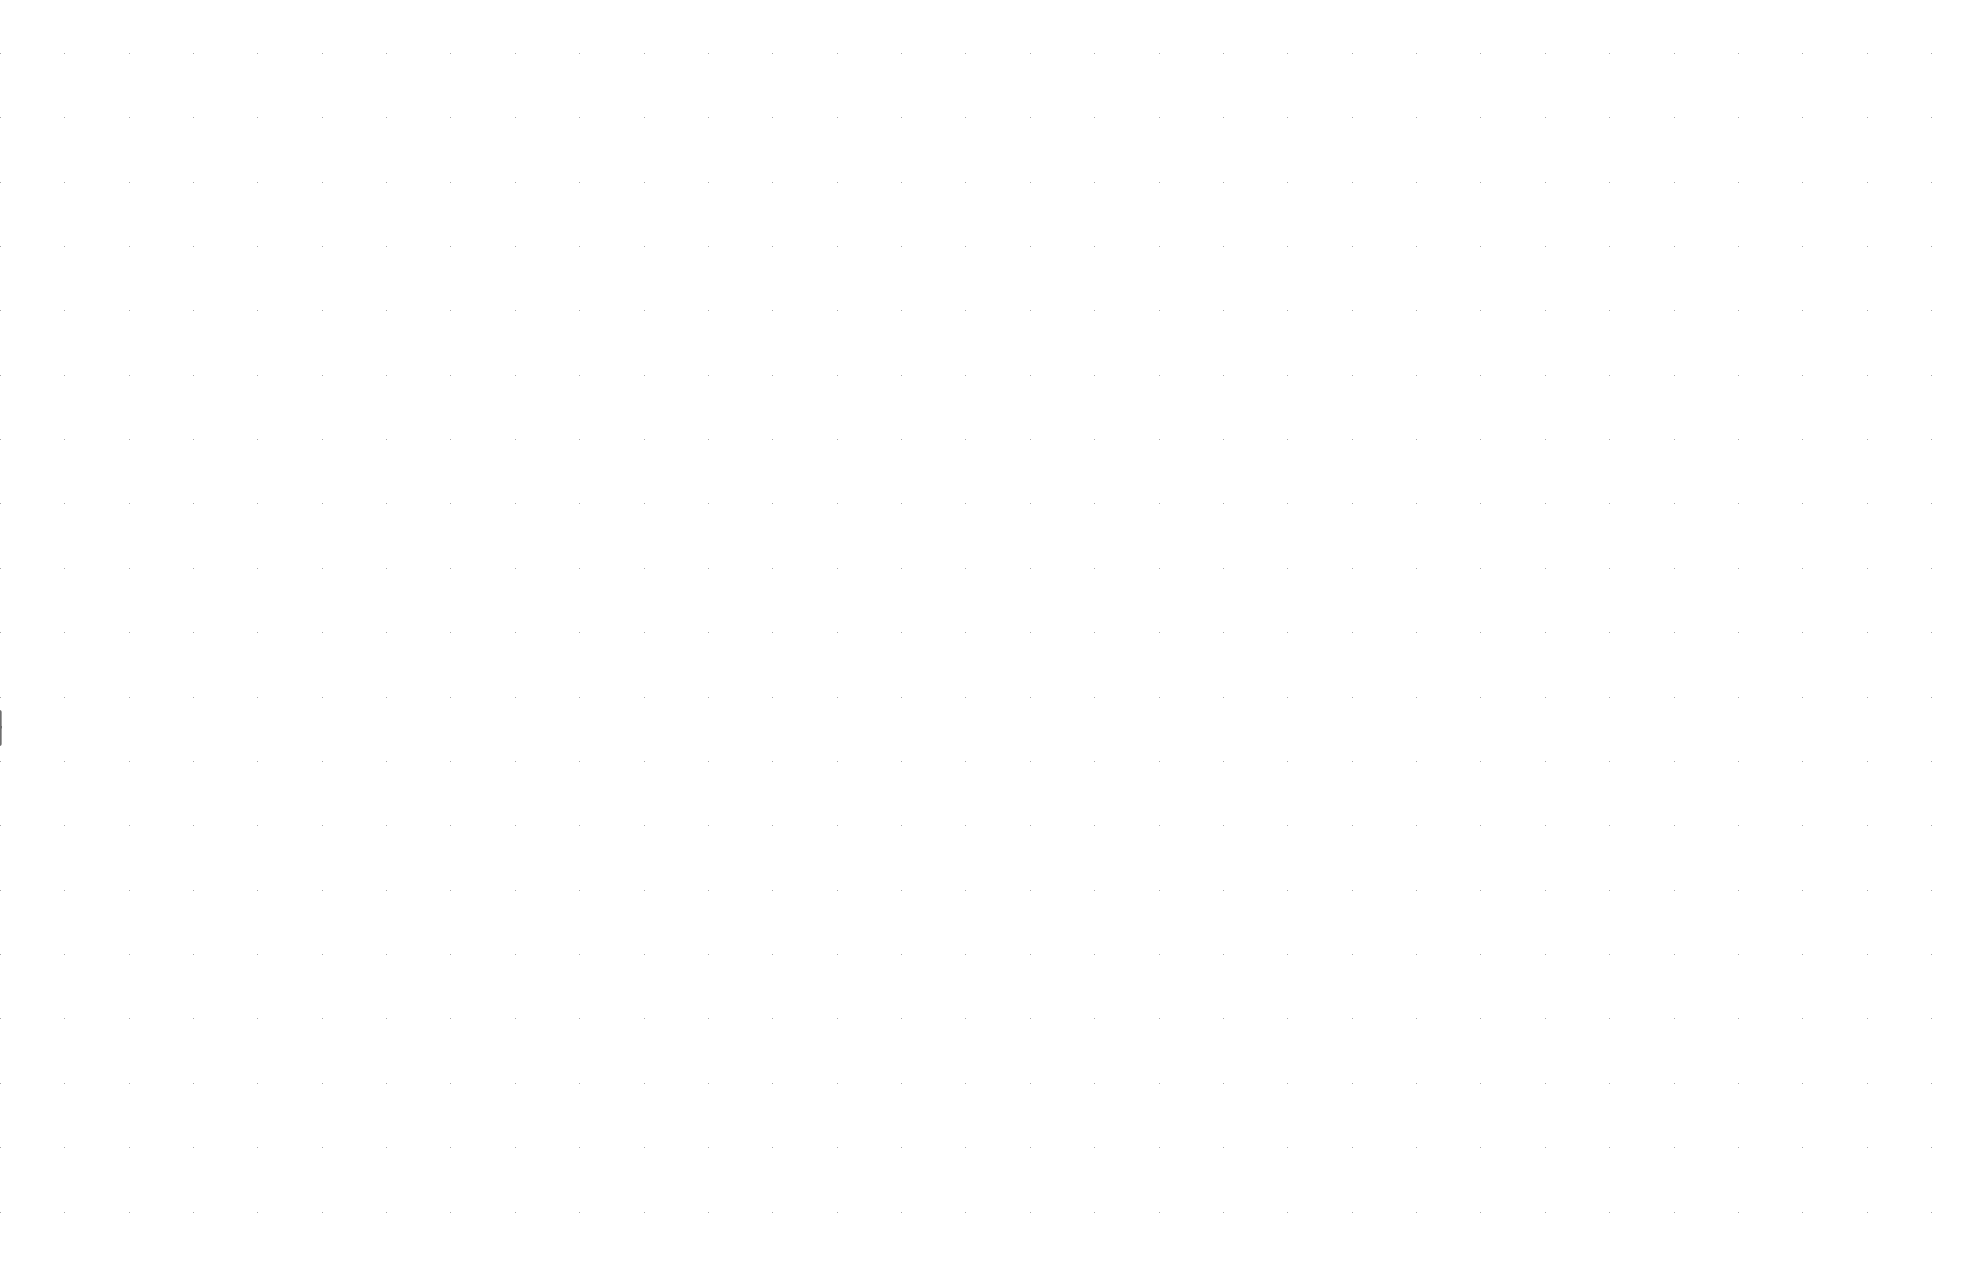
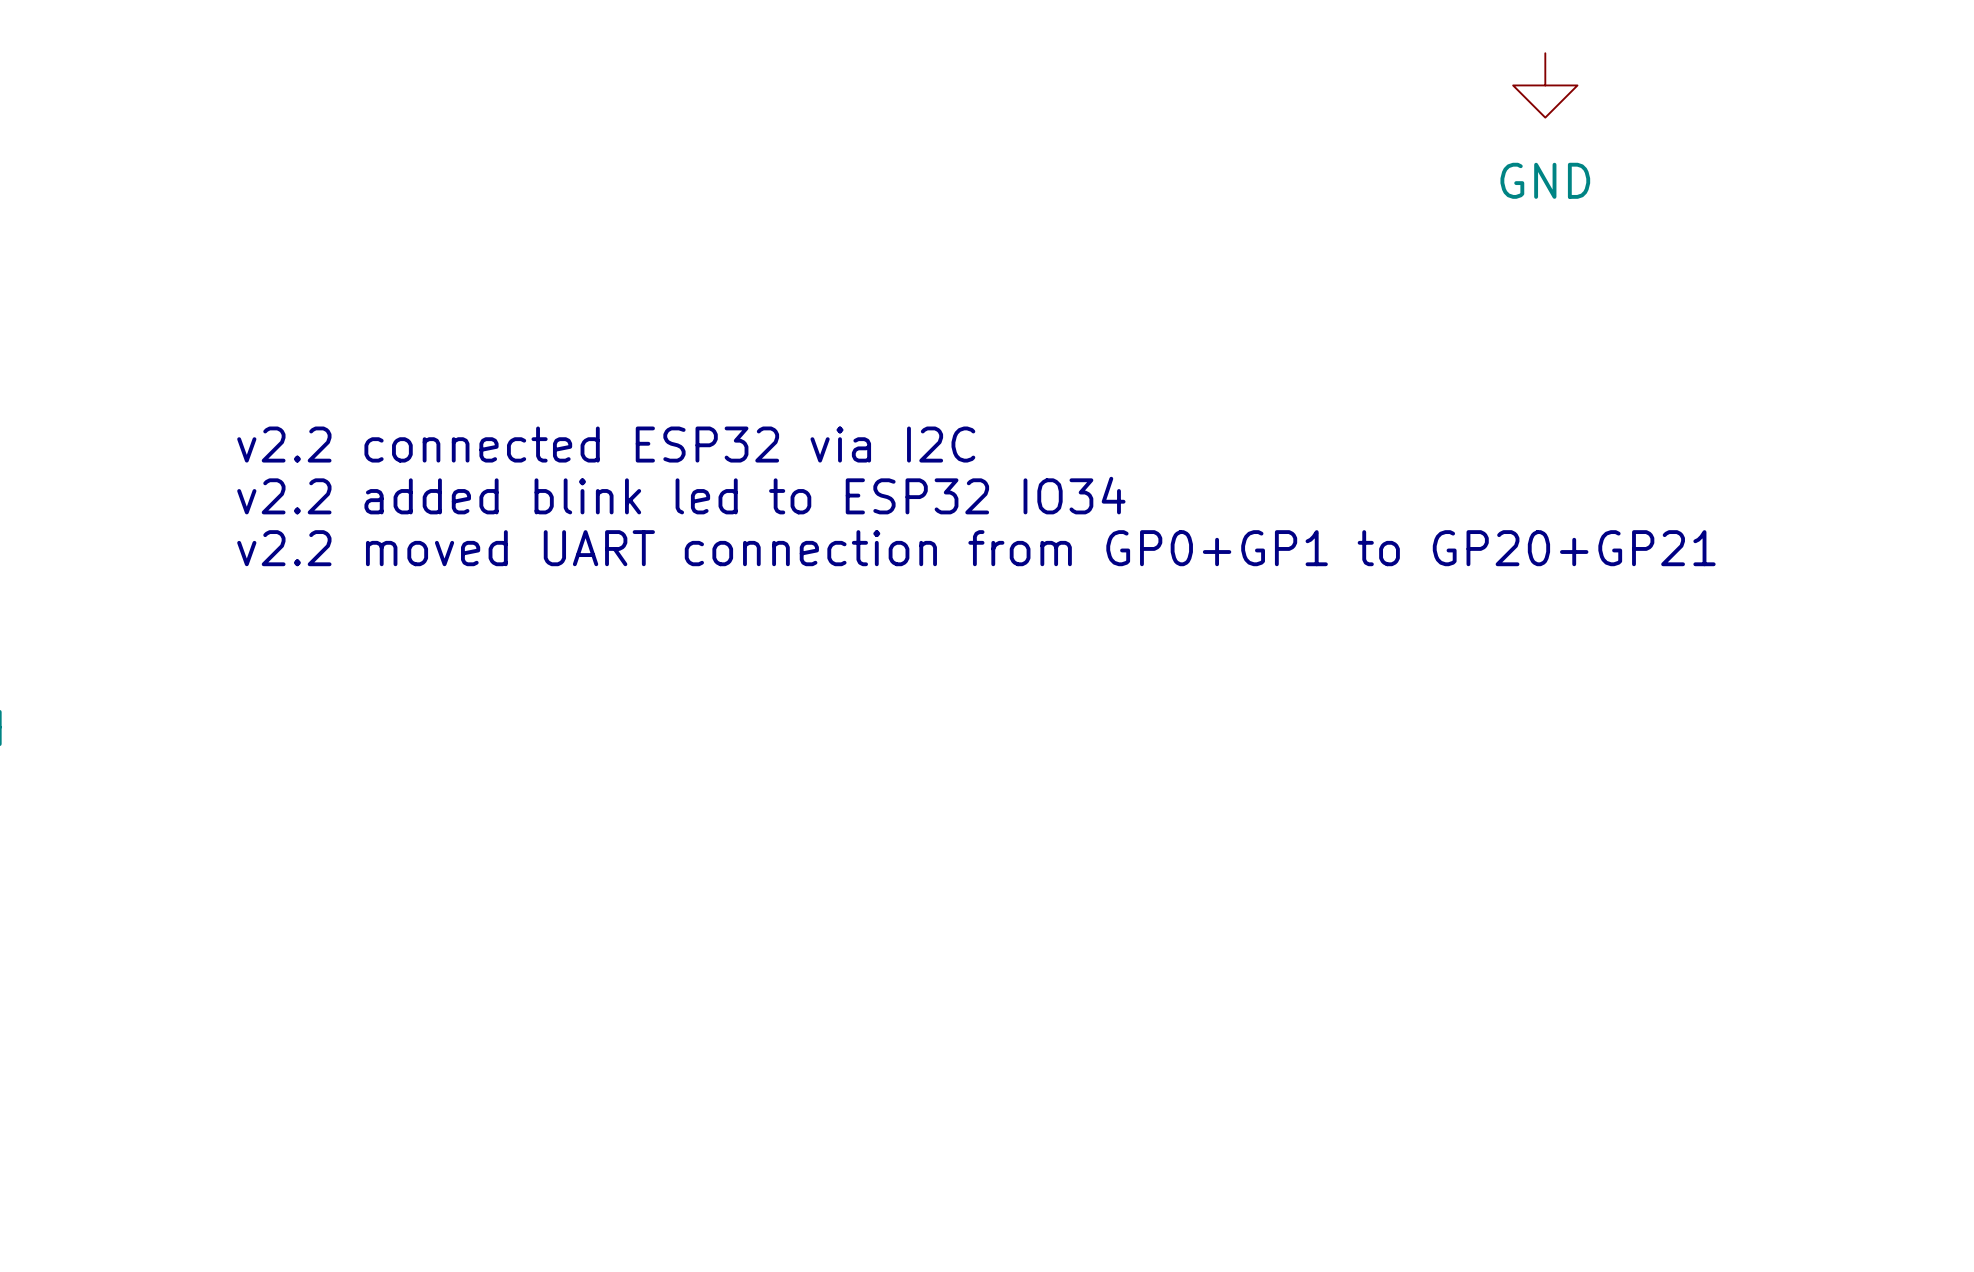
power symbol: none -> GND (1545, 85)
text: none -> v2.2 connected ESP32 via I2C (606, 444)
text: none -> v2.2 added blink led to ESP32 IO34 (681, 495)
text: none -> v2.2 moved UART connection from GP0+GP1 to GP20+GP21 (976, 548)

